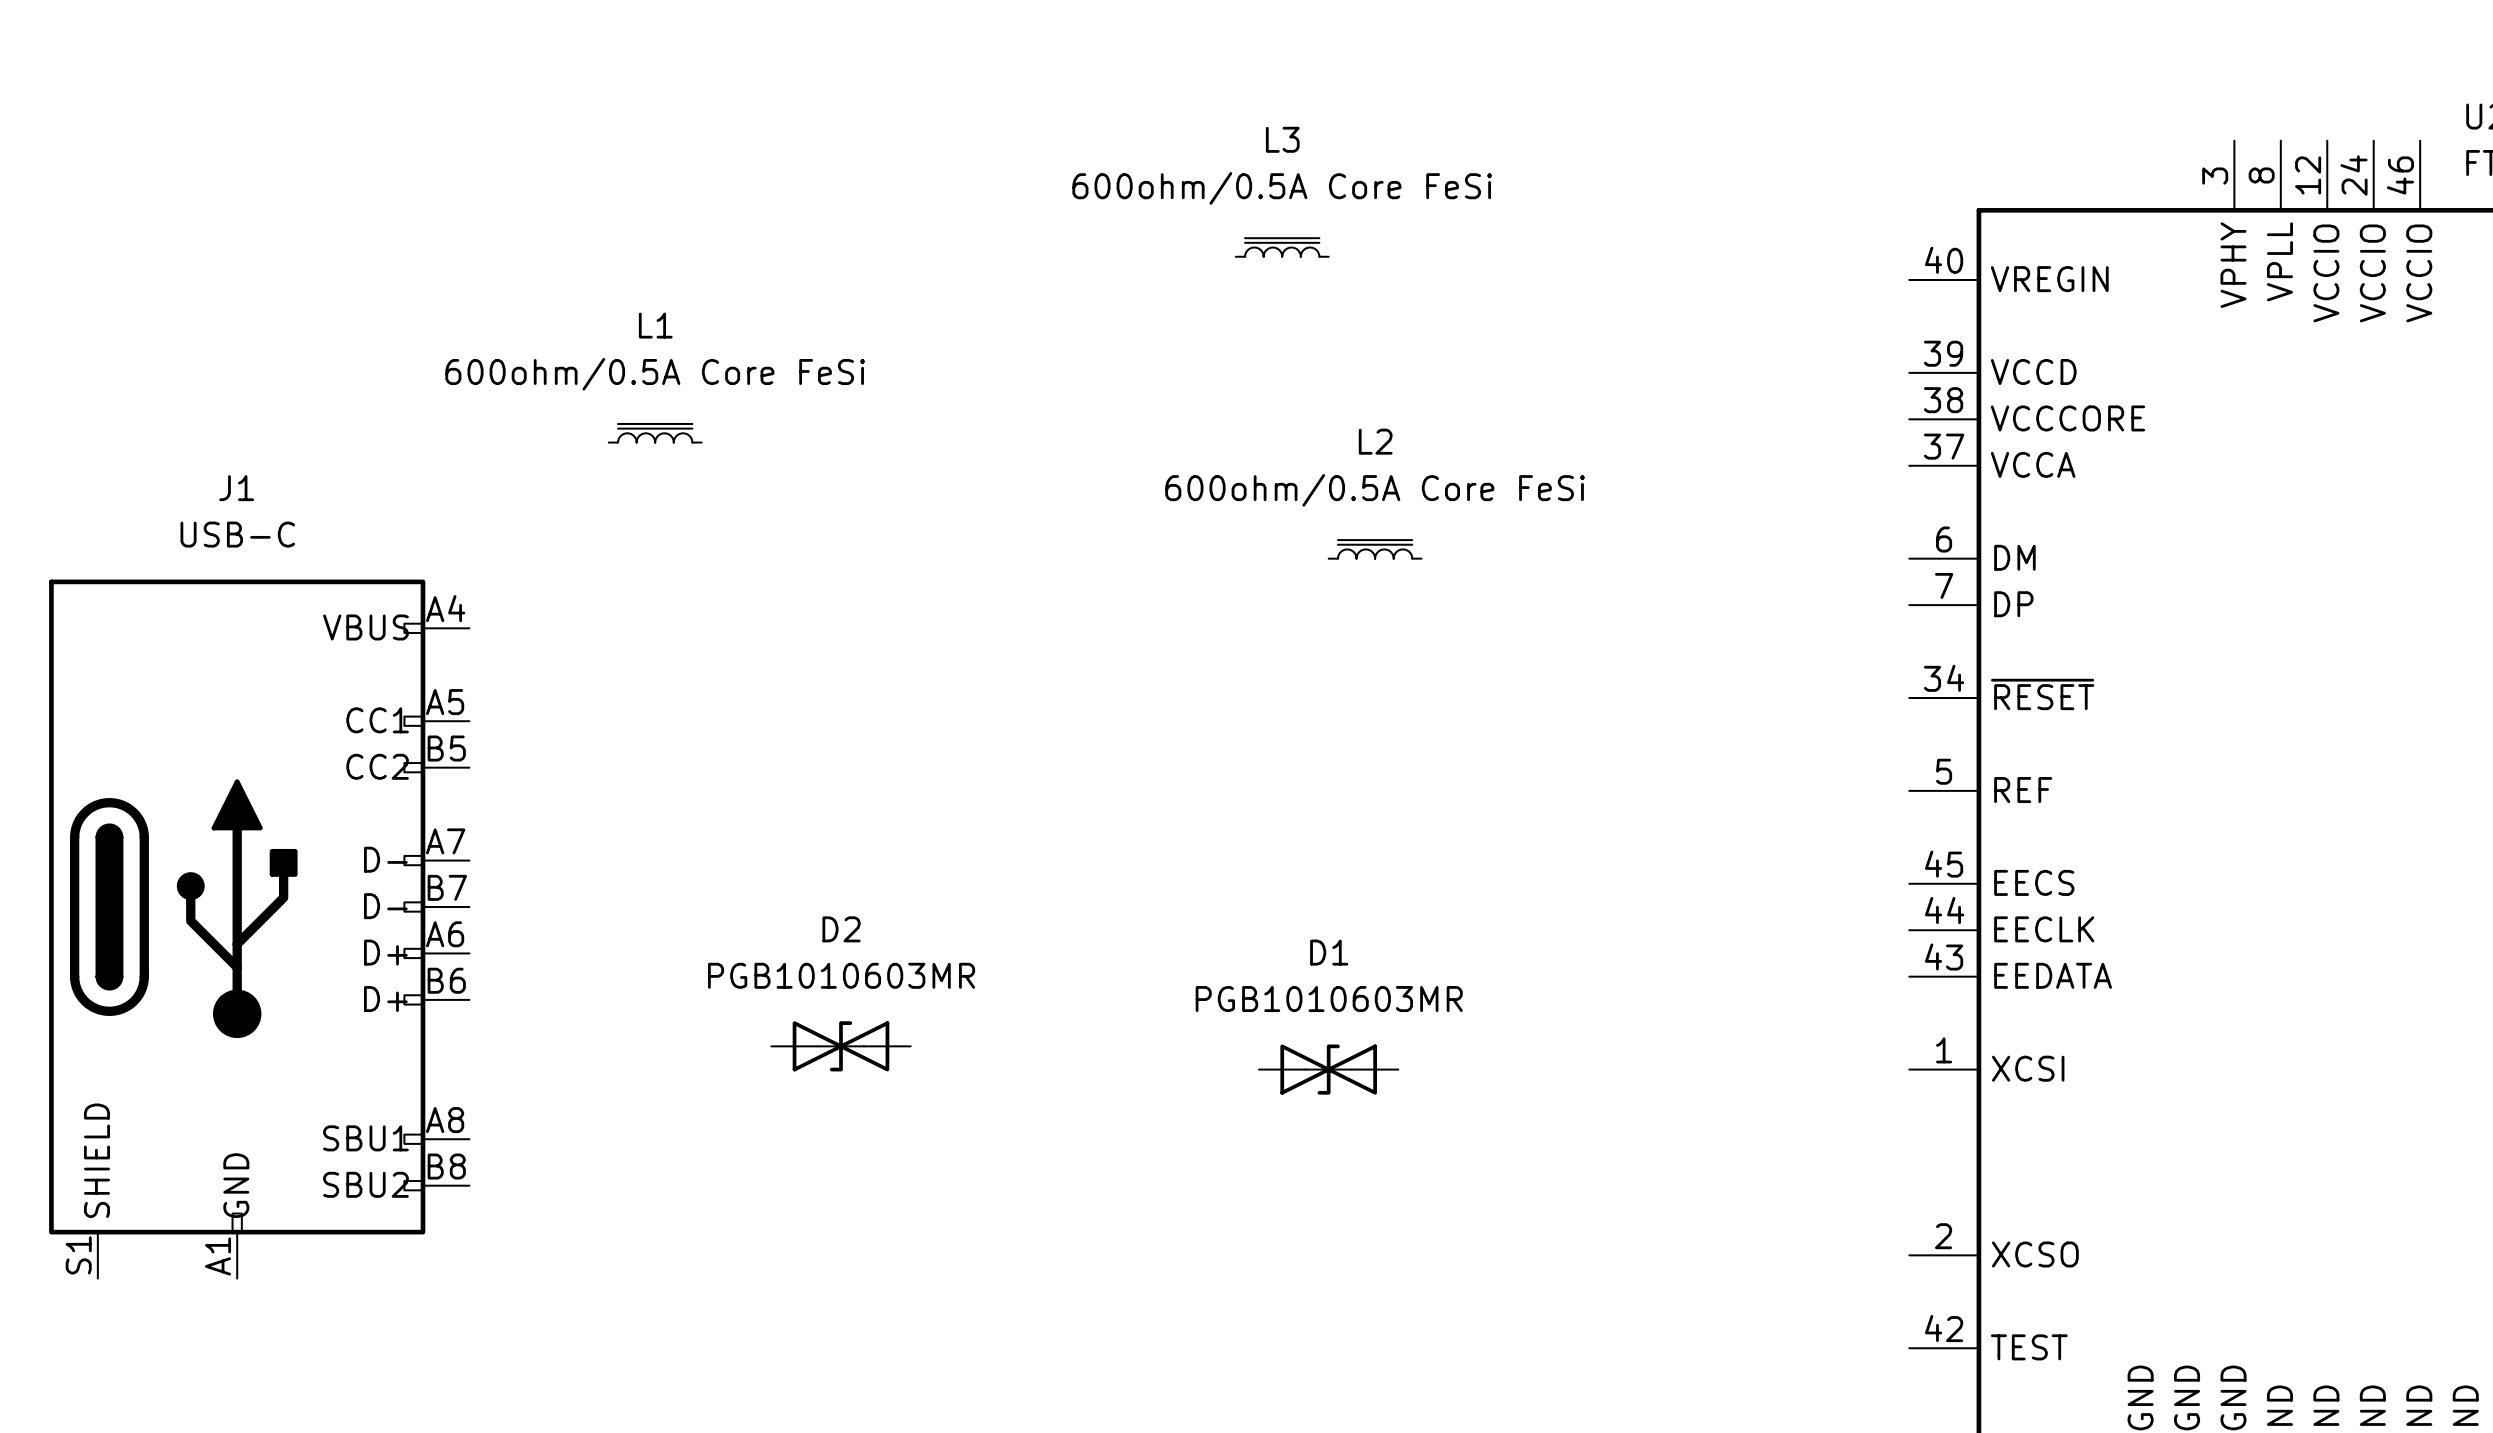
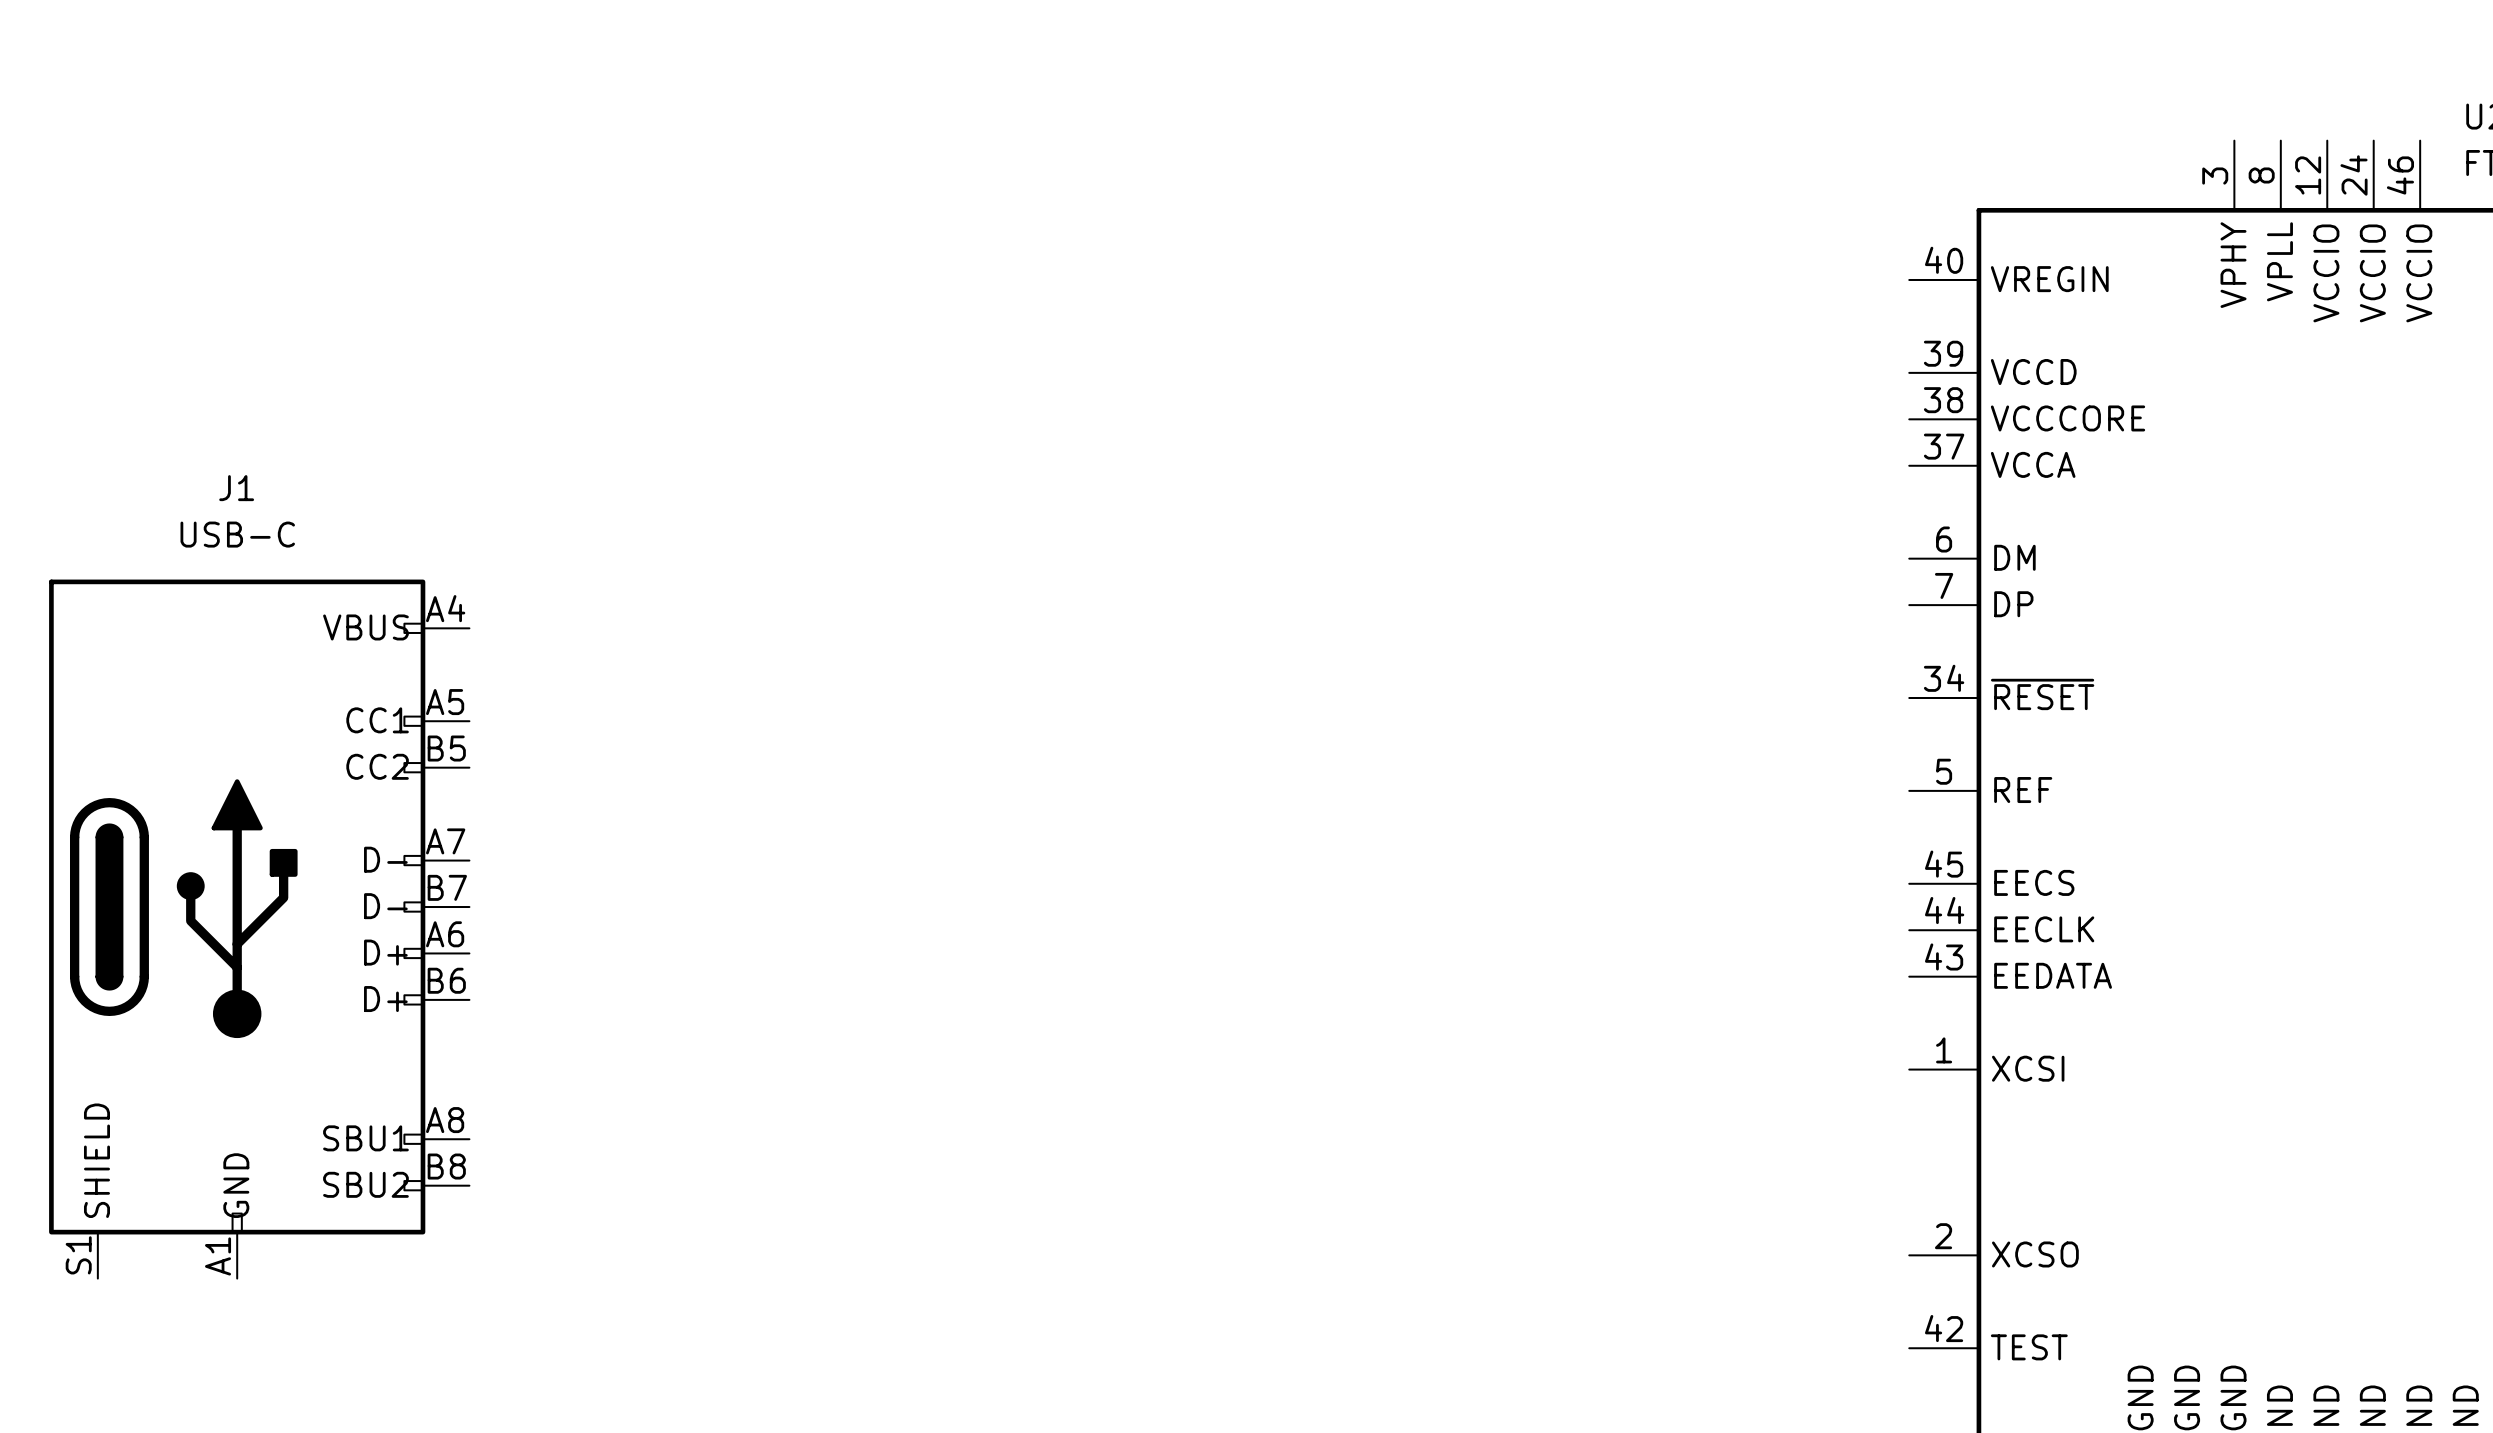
L3: 600ohm/0.5A Core FeSi (1282, 247) -> none
L1: 600ohm/0.5A Core FeSi (655, 433) -> none
L2: 600ohm/0.5A Core FeSi (1375, 549) -> none
D2: PGB1010603MR (840, 1046) -> none
D1: PGB1010603MR (1328, 1069) -> none

